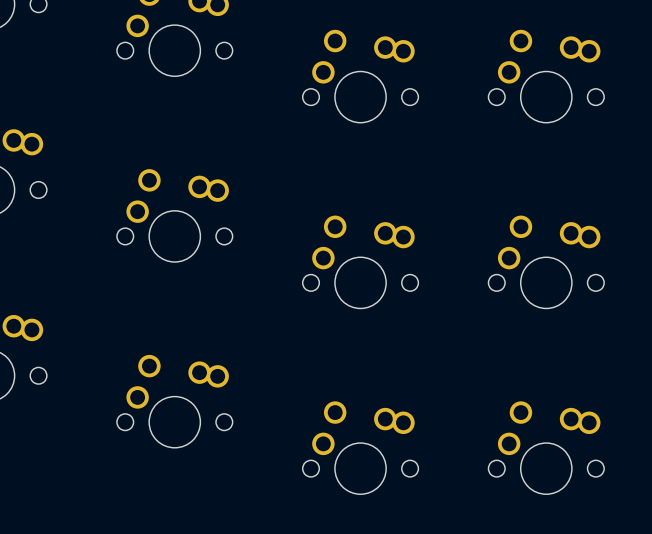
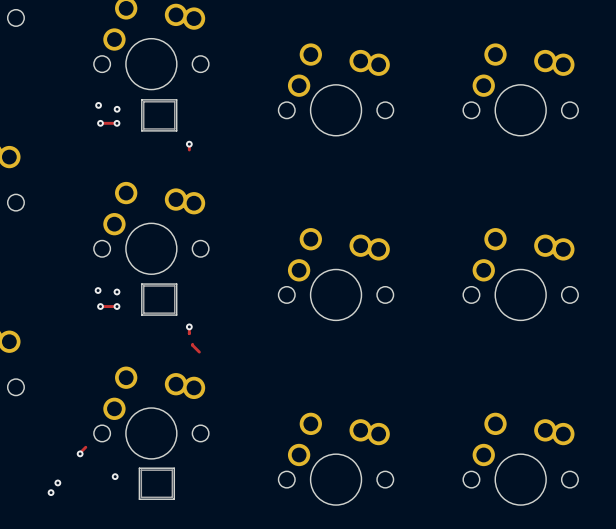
via: none -> (98, 105)
via: none -> (117, 109)
part: none -> (159, 115)
track: none -> (100, 123) (116, 123)
via: none -> (100, 123)
via: none -> (116, 123)
track: none -> (189, 144) (189, 149)
via: none -> (189, 144)
via: none -> (98, 290)
via: none -> (116, 291)
part: none -> (159, 299)
track: none -> (100, 306) (116, 306)
via: none -> (100, 306)
via: none -> (116, 306)
track: none -> (189, 326) (189, 333)
via: none -> (189, 326)
track: none -> (192, 344) (199, 352)
track: none -> (85, 447) (80, 453)
via: none -> (80, 453)
via: none -> (115, 476)
via: none -> (57, 482)
part: none -> (156, 483)
via: none -> (51, 492)

